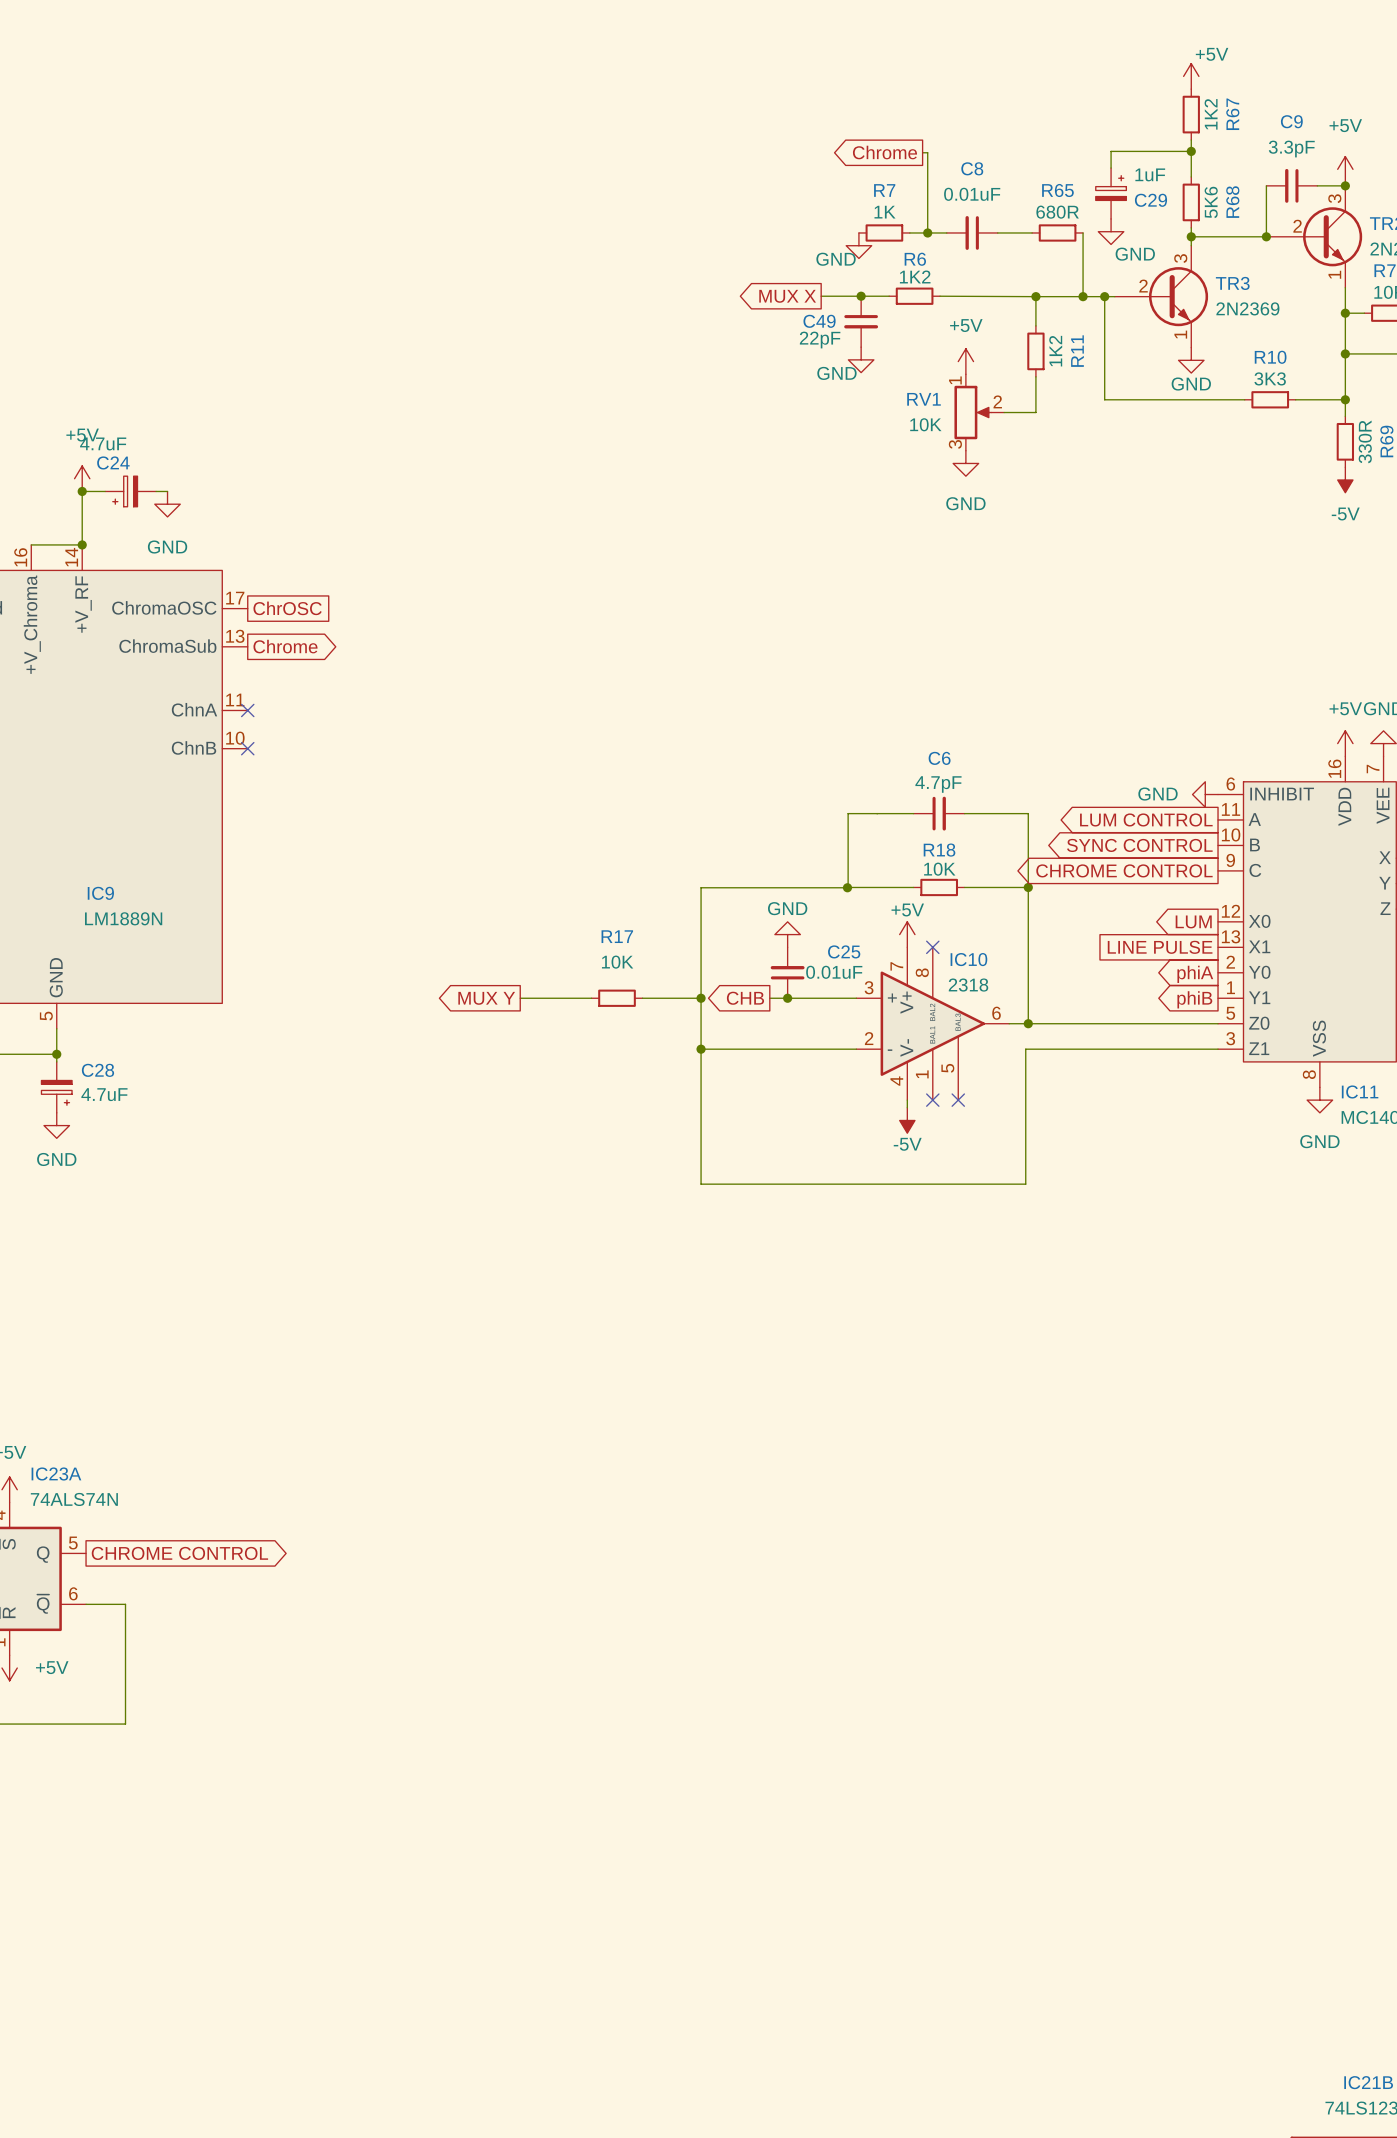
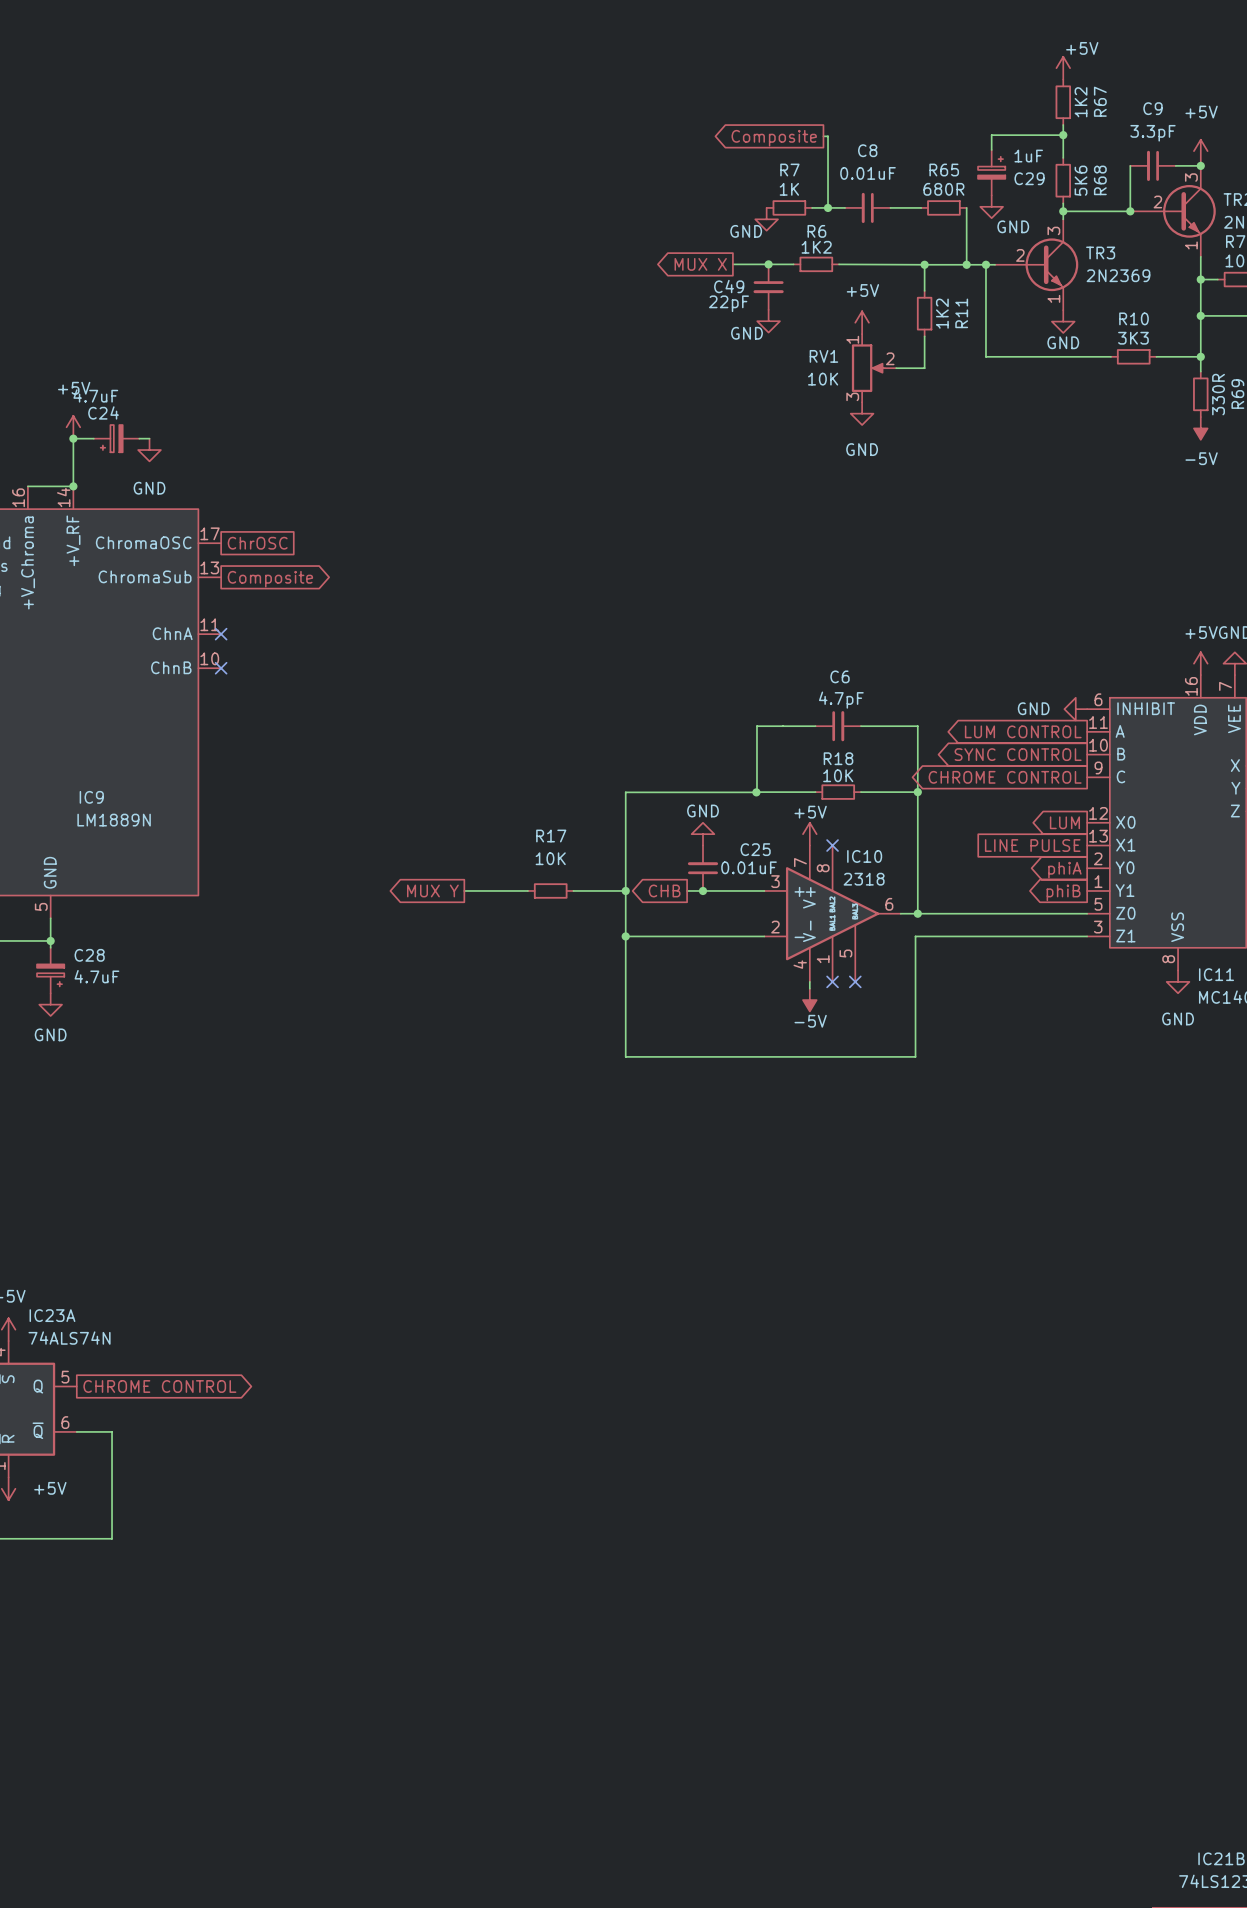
global label: Chrome (884, 152) -> Composite (774, 138)
global label: Chrome (285, 646) -> Composite (270, 579)

